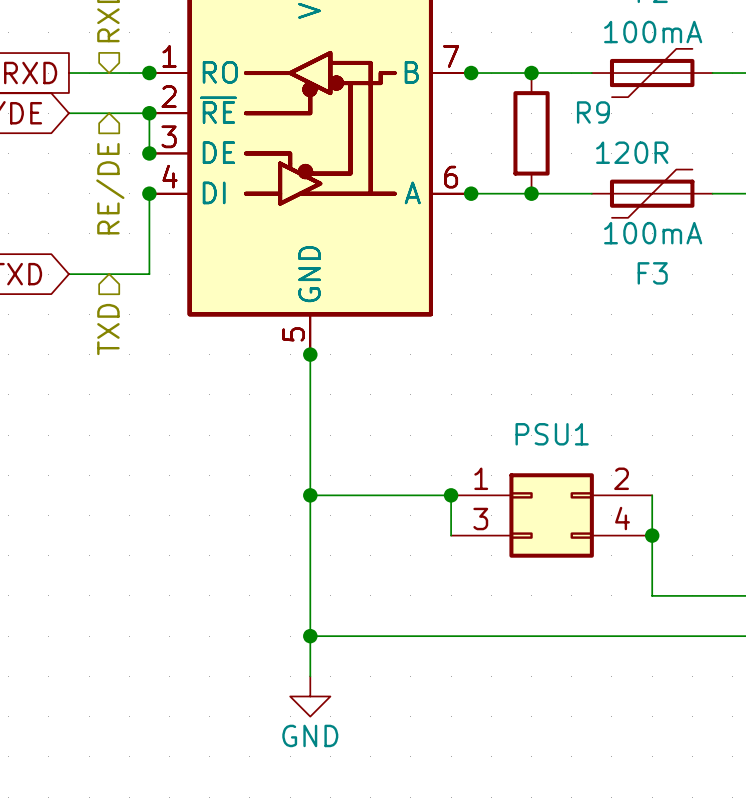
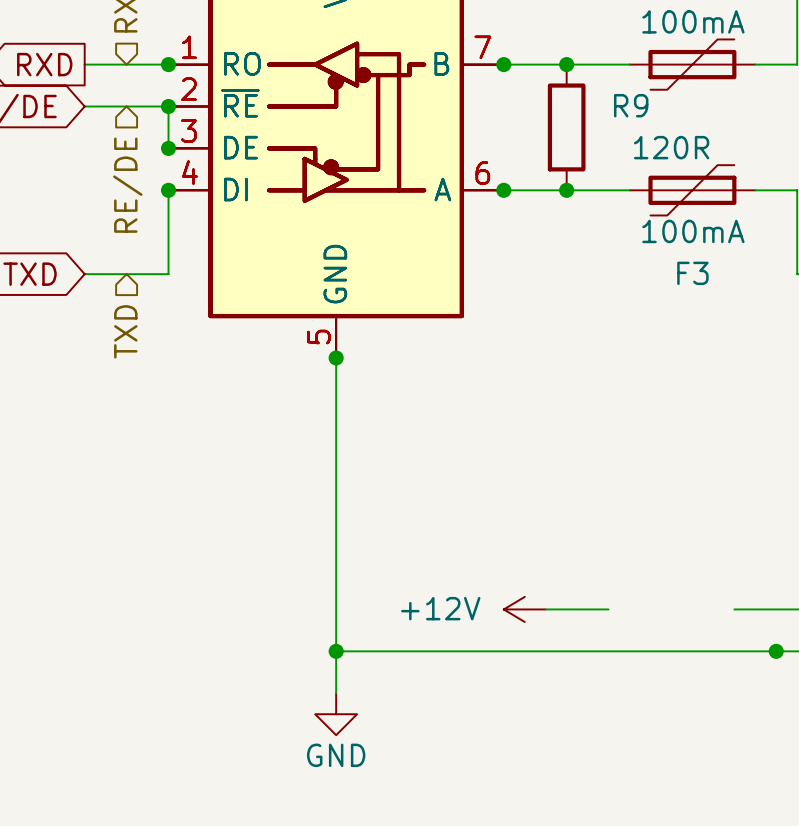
wire: (310, 495) (451, 495) (451, 535) -> none
junction: (310, 495) -> none
junction: (451, 495) -> none
wire: (652, 495) (652, 595) (692, 595) -> none
PSU1: (551, 515) -> none
junction: (652, 535) -> none
power symbol: none -> +12V (524, 609)
wire: none -> (545, 609) (608, 609)
junction: none -> (776, 651)

